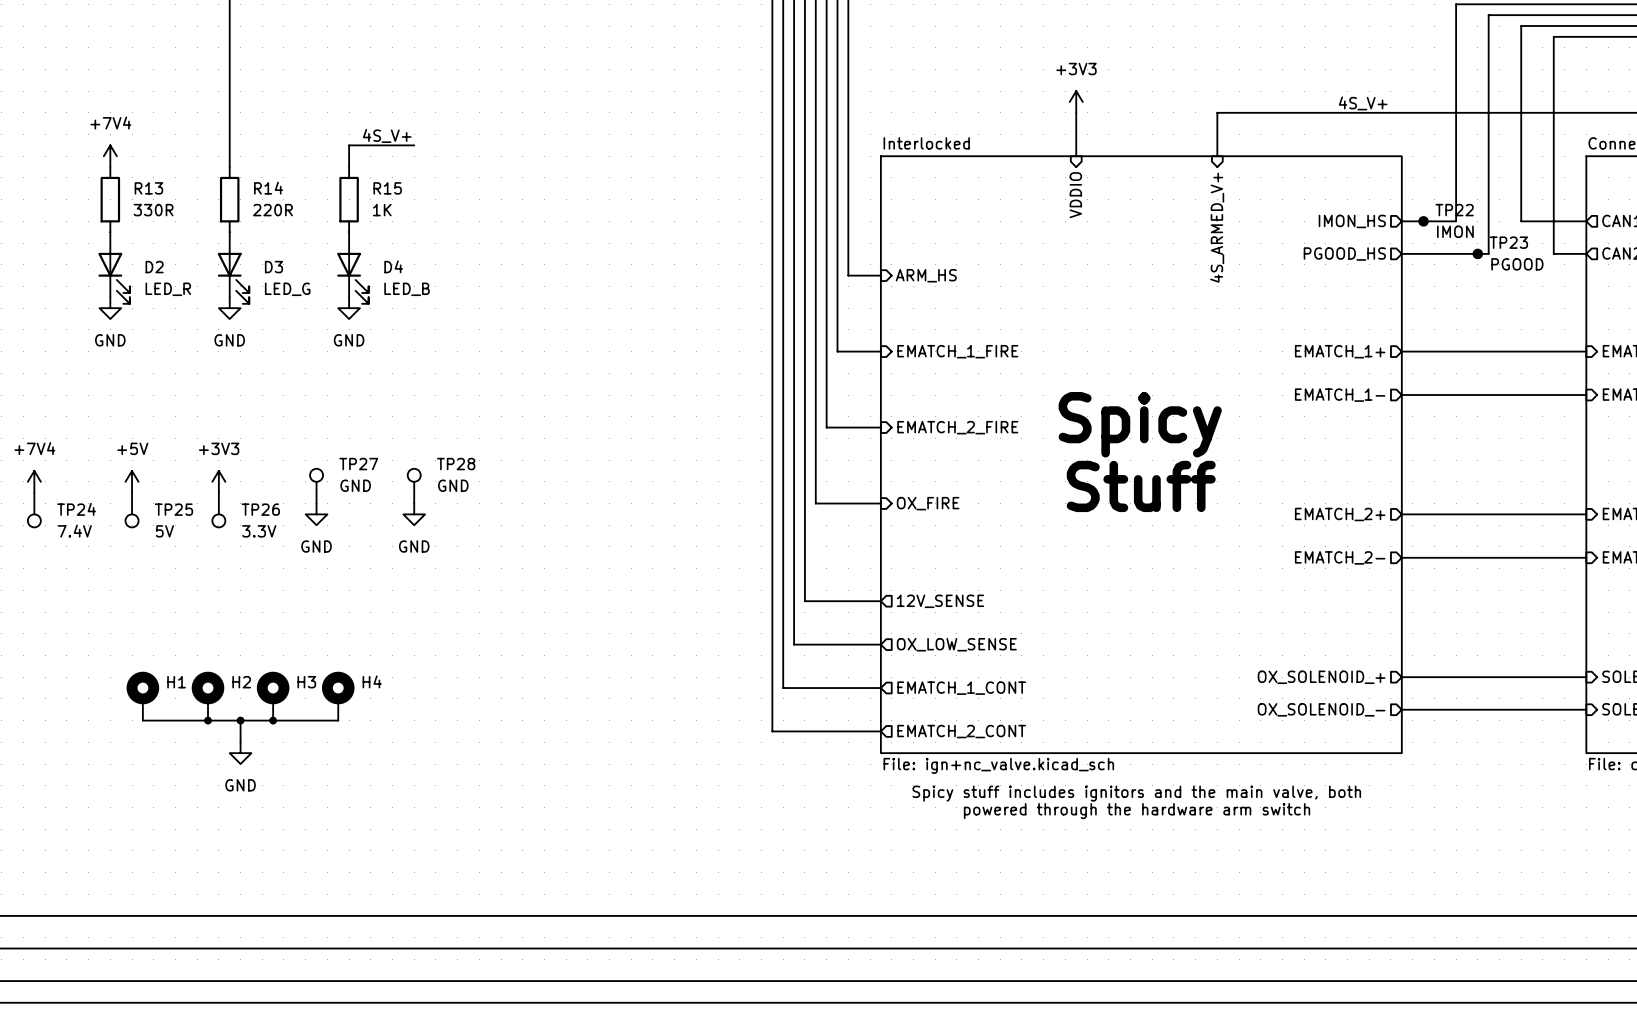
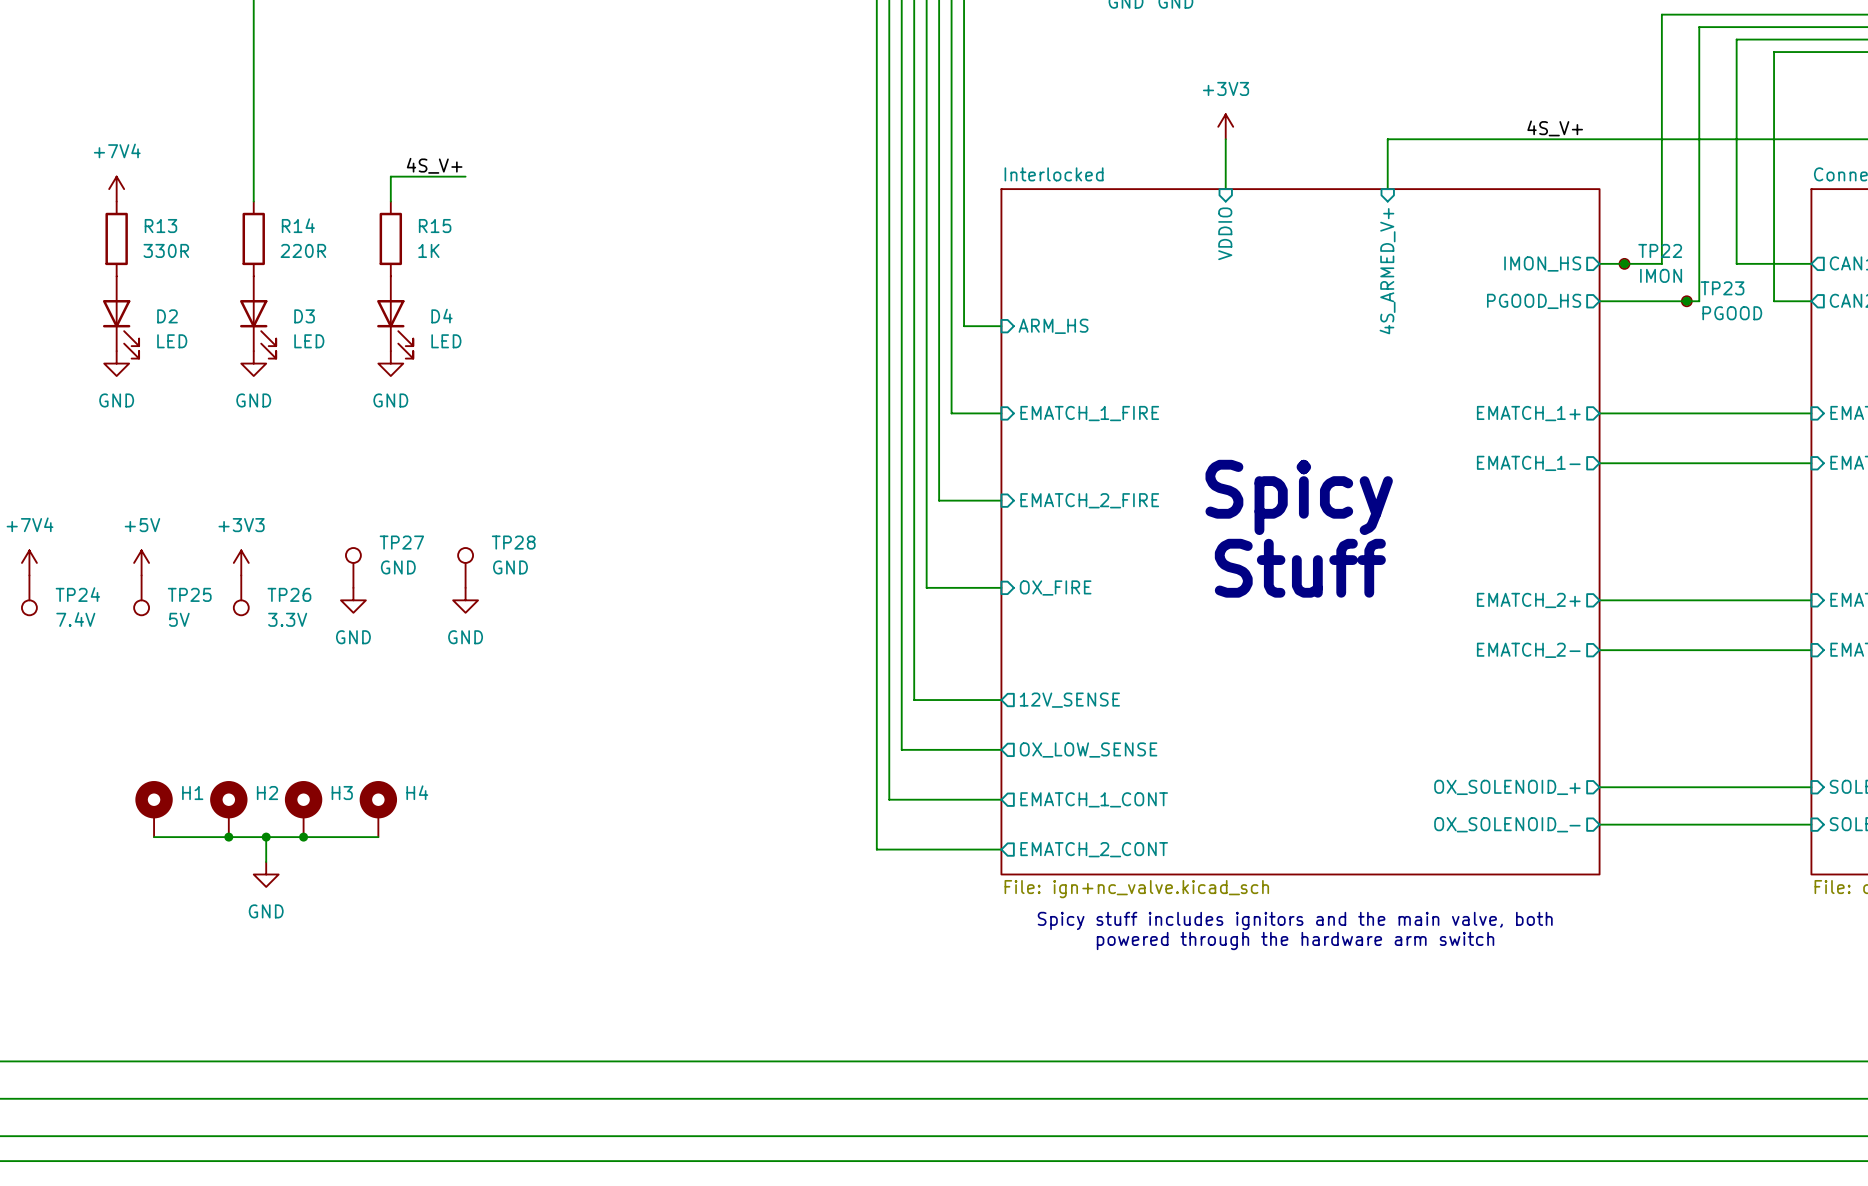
D2 value: LED_R (168, 289) -> LED (172, 341)
D3 value: LED_G (287, 289) -> LED (309, 341)
D4 value: LED_B (407, 289) -> LED (446, 341)

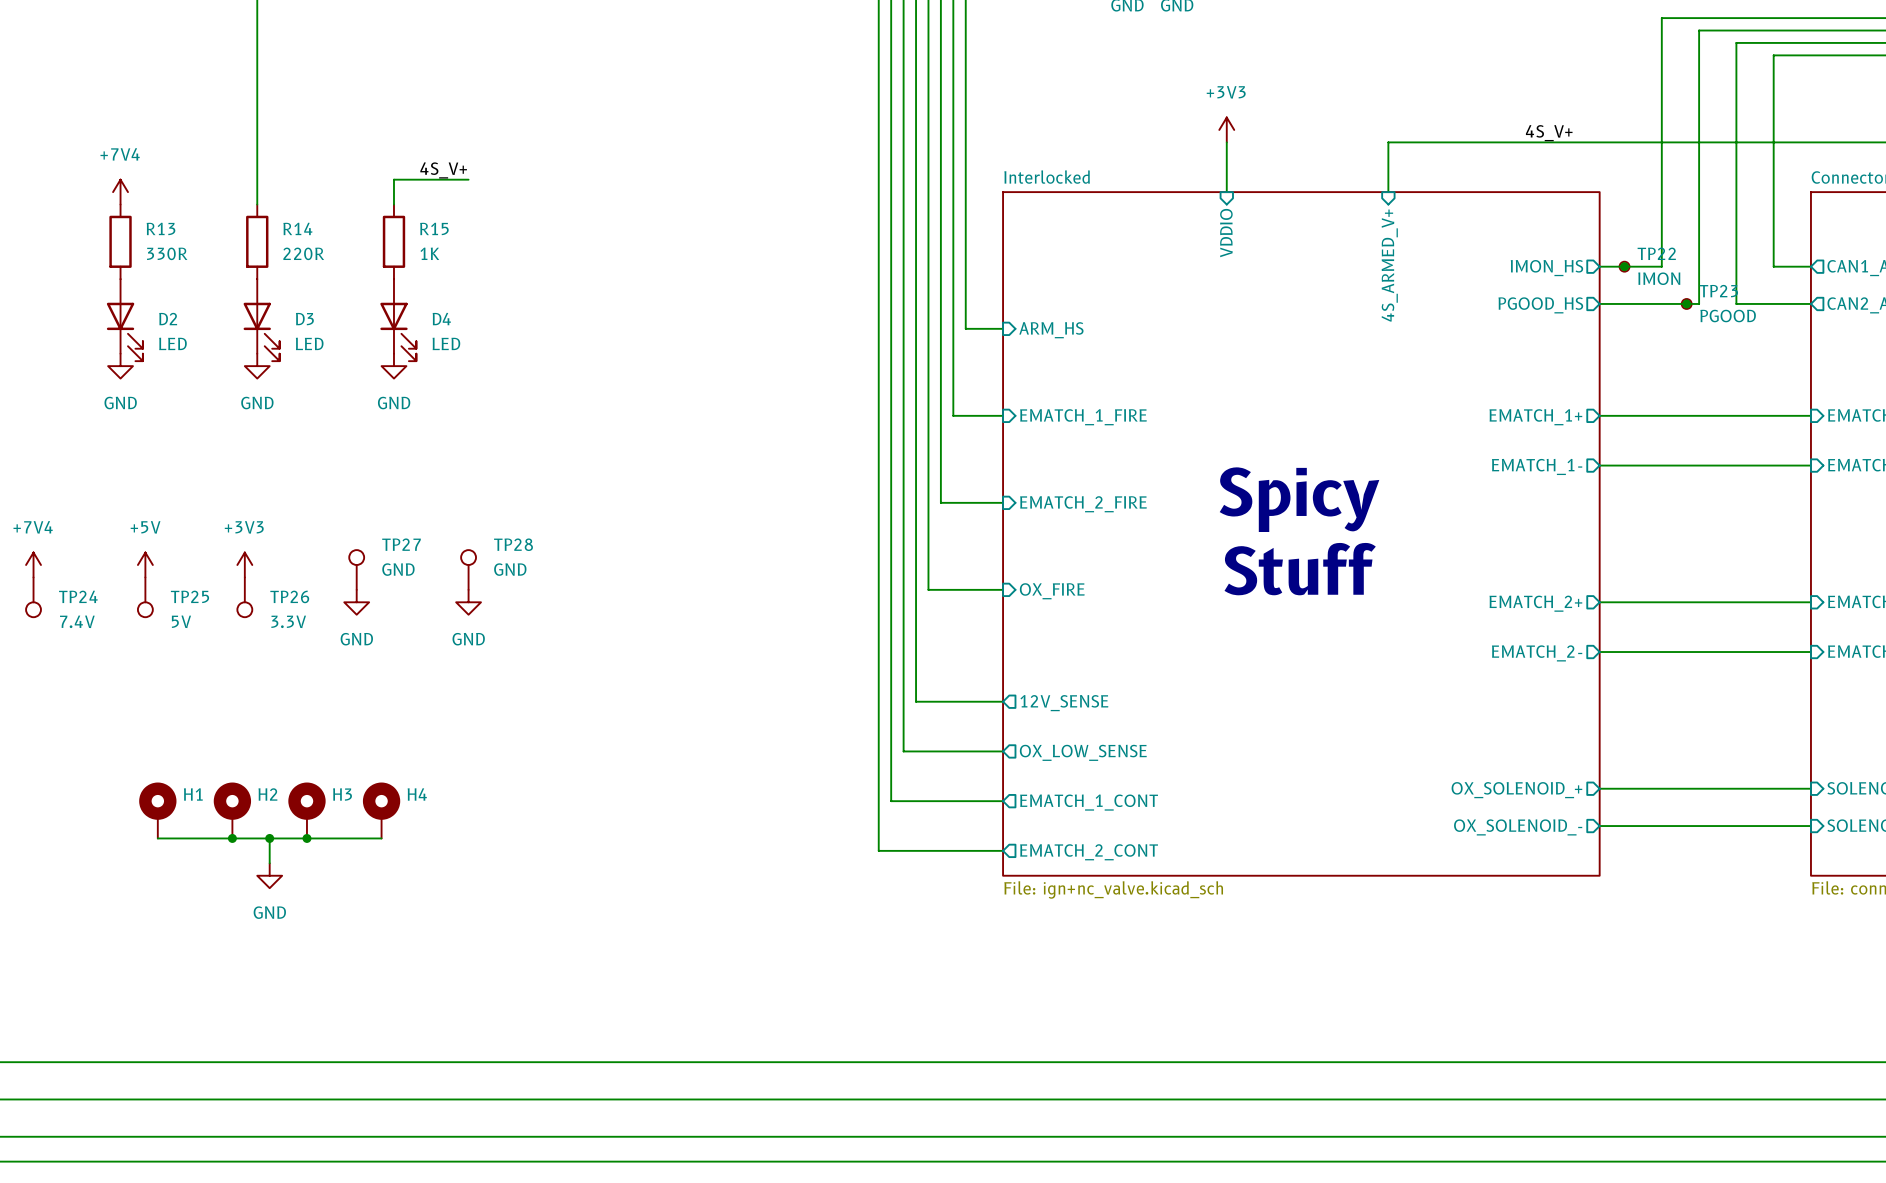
wire: (1736, 263) (1774, 263) (1774, 301) -> (1736, 266) (1736, 303) (1773, 303)
text: Spicy stuff includes ignitors and the main valve, both (1295, 920) -> none
text: powered through the hardware arm switch (1295, 940) -> none

